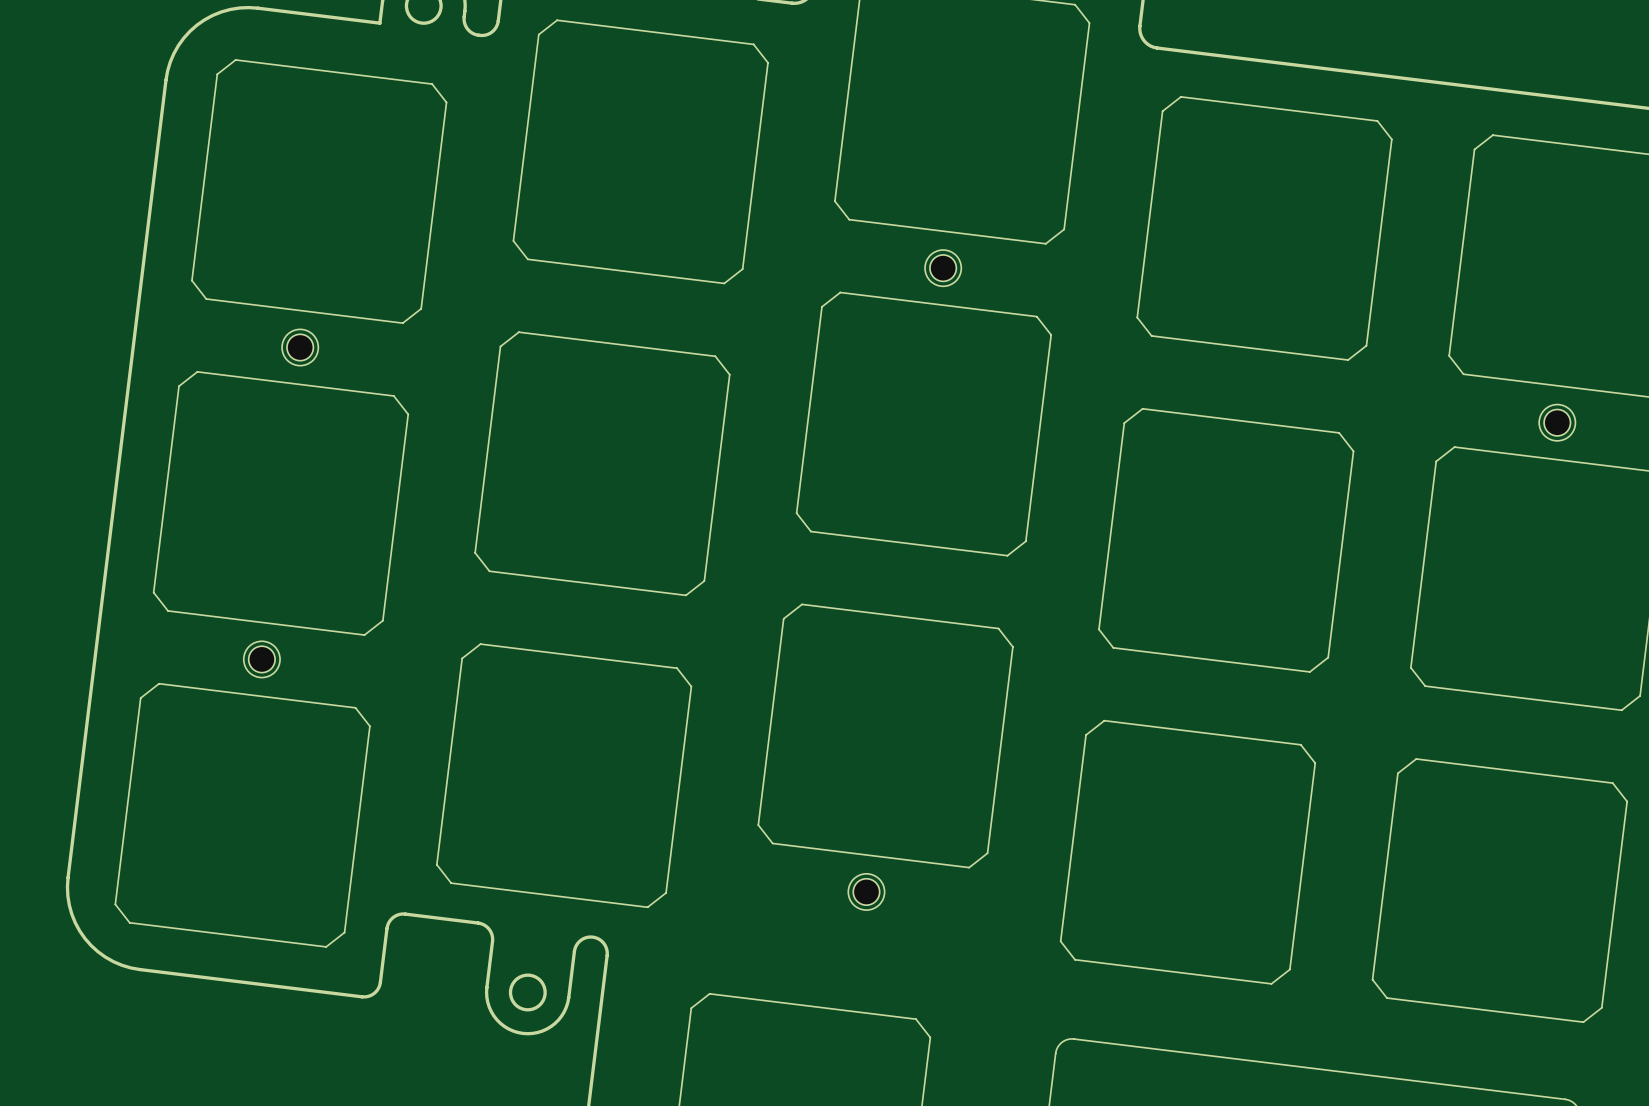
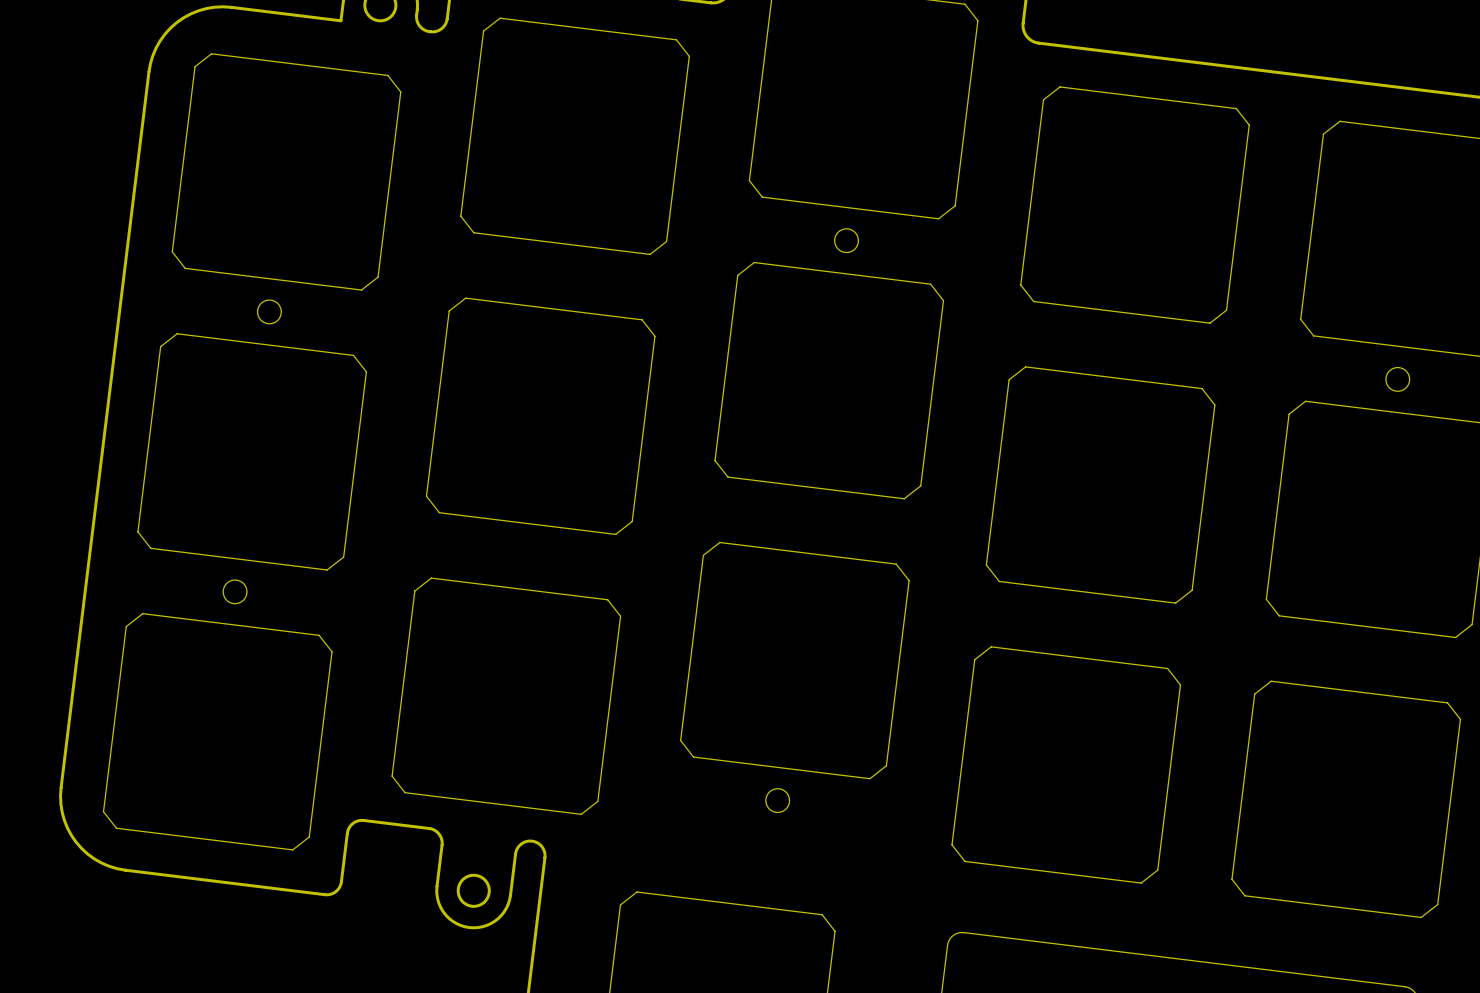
drawing: none -> [834, 228, 859, 253]
part: (943, 268) -> none
drawing: none -> [257, 299, 282, 325]
part: (300, 347) -> none
drawing: none -> [1385, 367, 1410, 392]
part: (1557, 422) -> none
drawing: none -> [222, 579, 248, 605]
part: (261, 659) -> none
drawing: none -> [765, 788, 790, 813]
part: (866, 891) -> none

